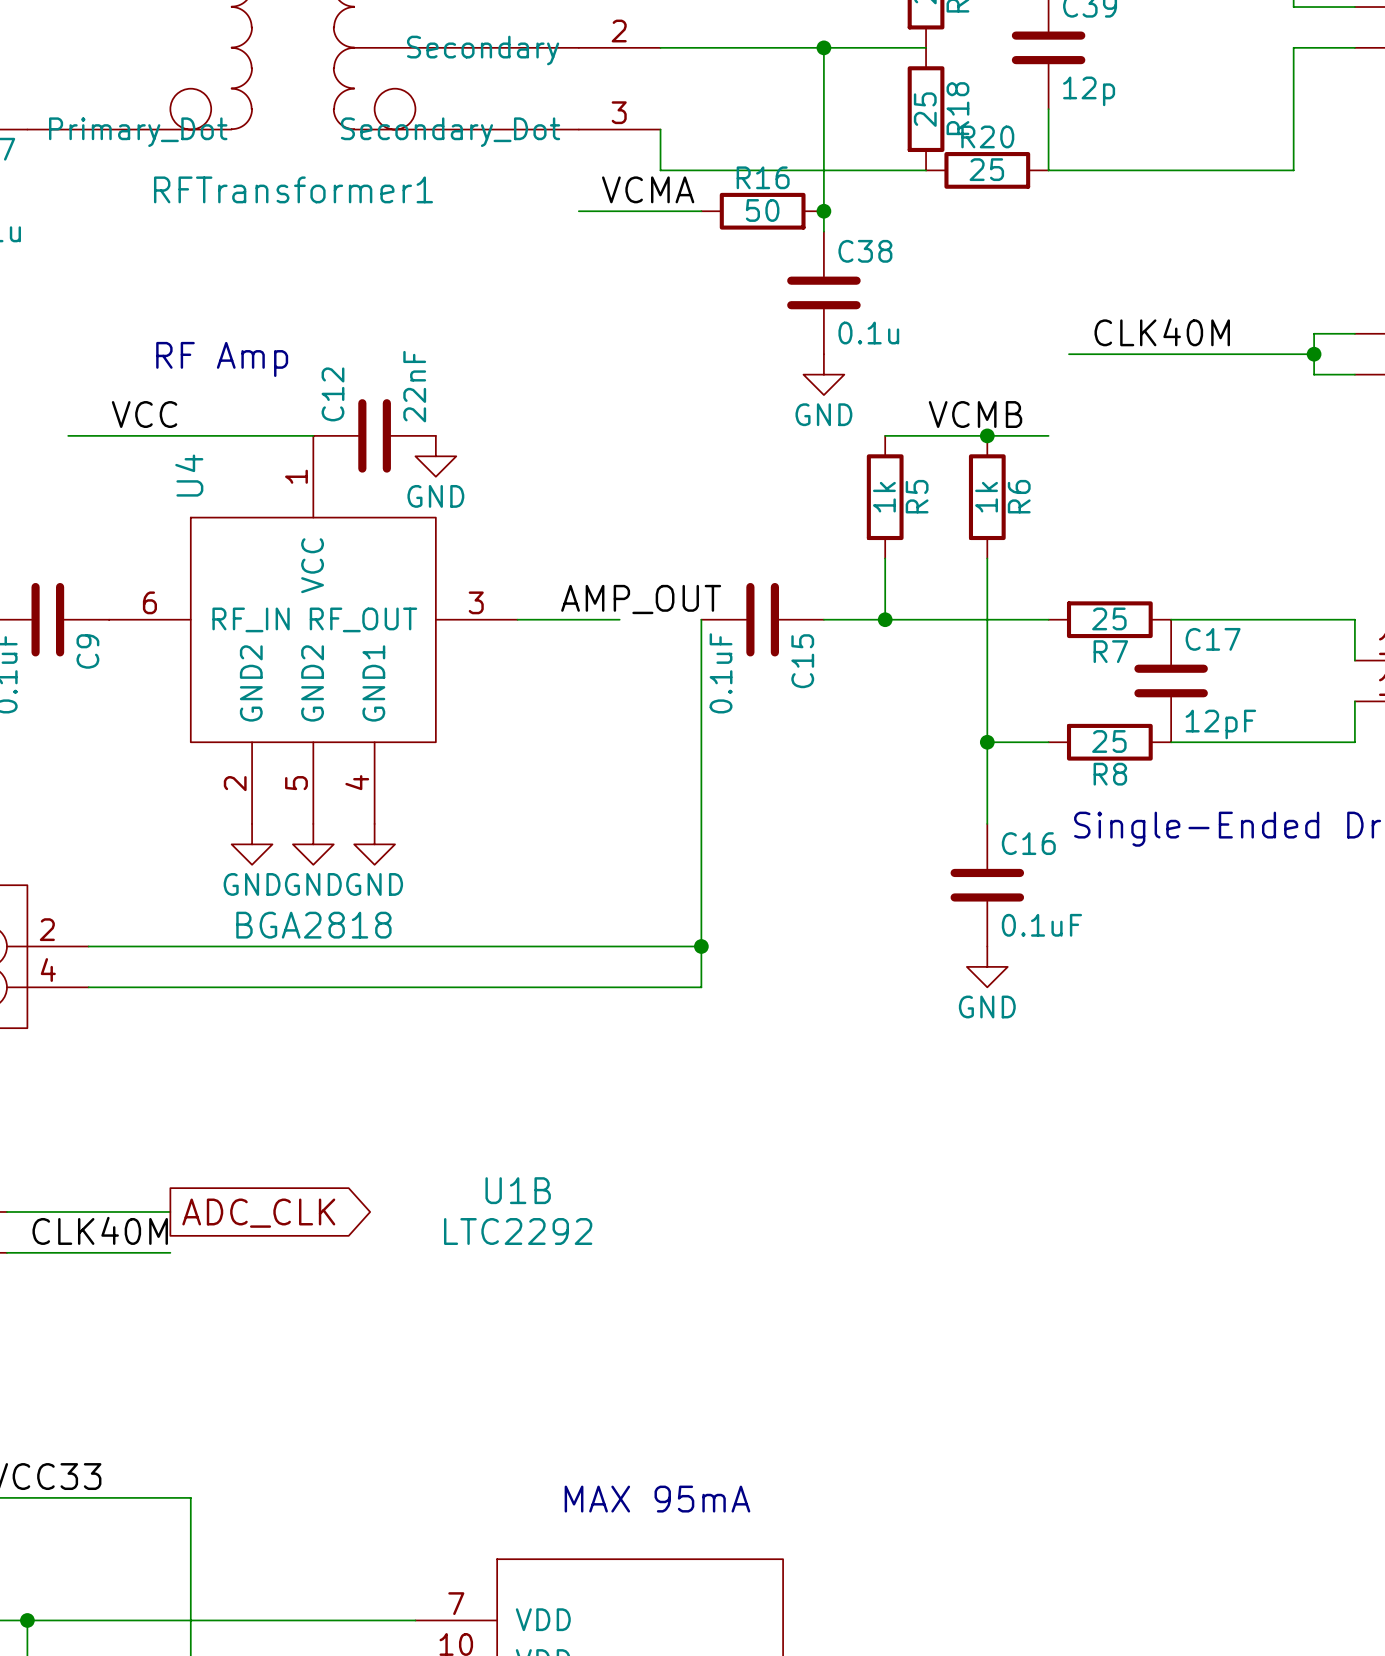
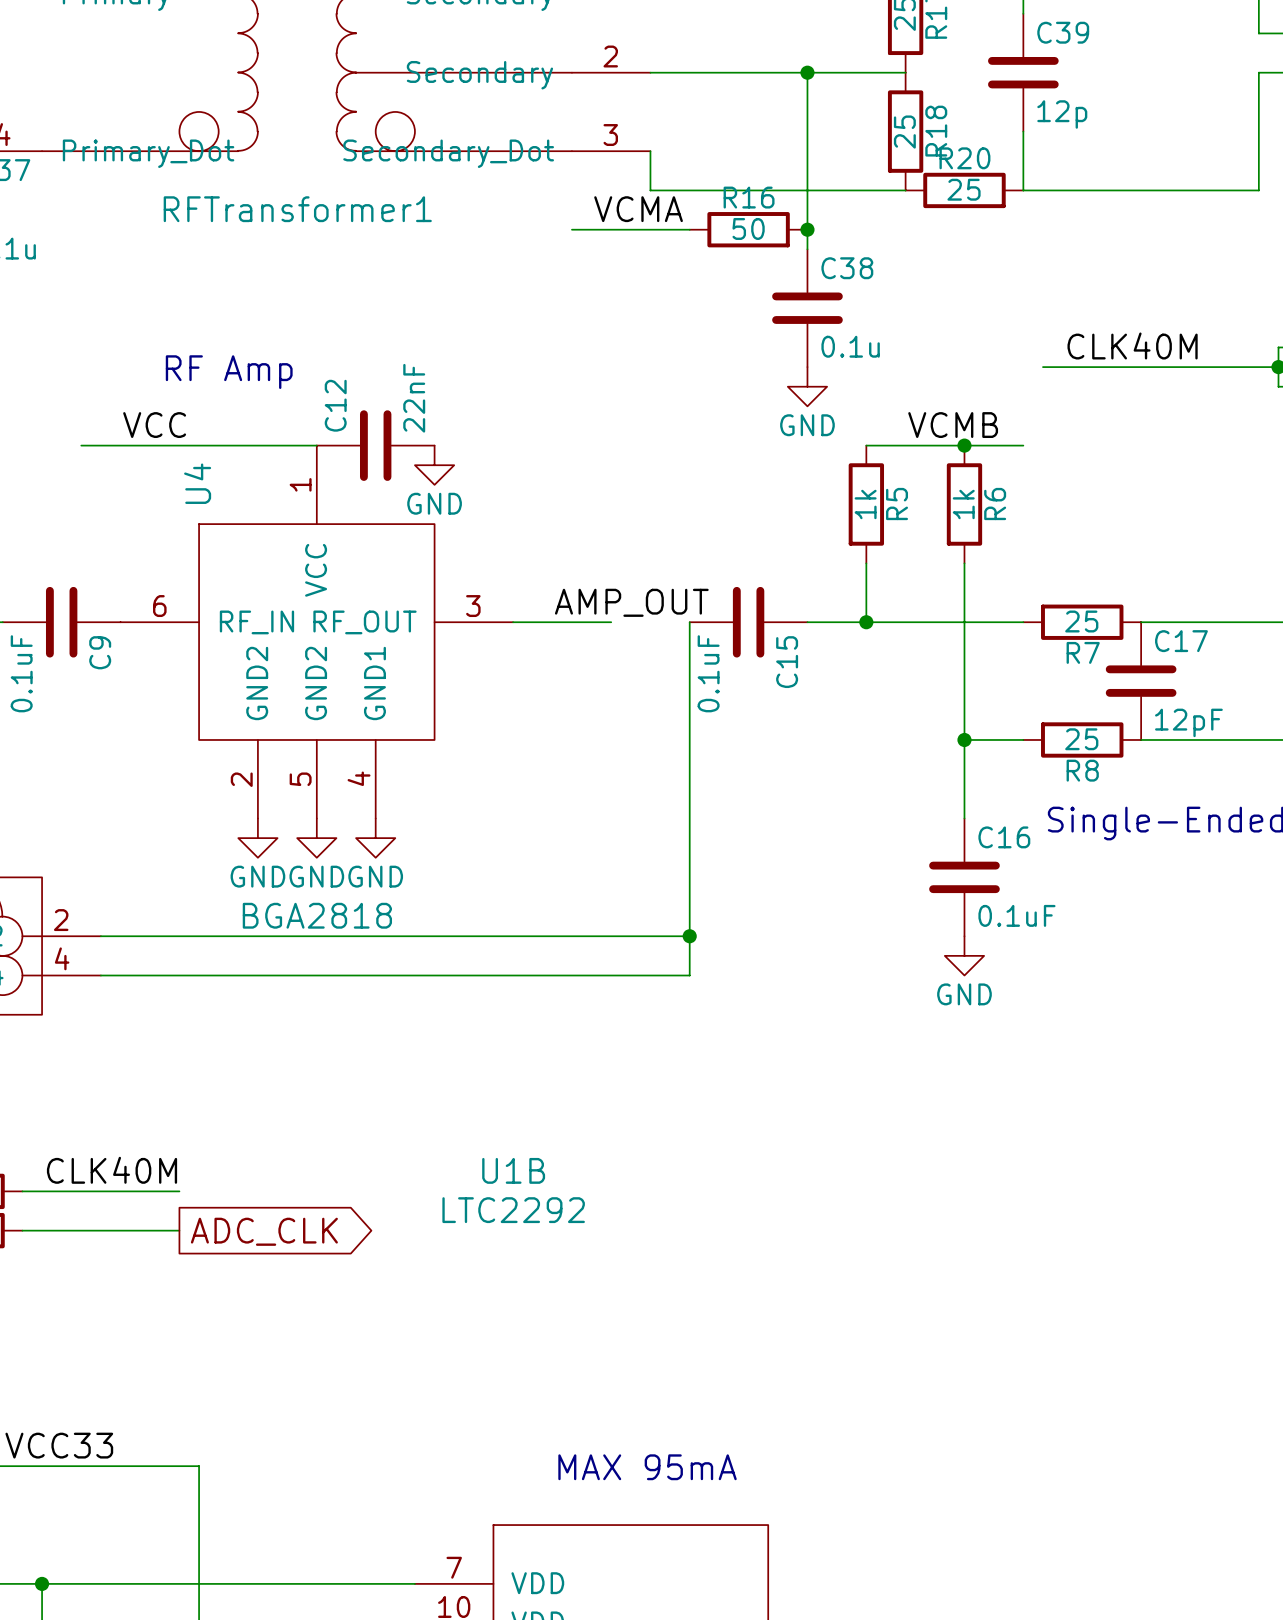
global label position: ADC_CLK (258, 1213) -> ADC_CLK (264, 1231)
label position: CLK40M (100, 1230) -> CLK40M (112, 1170)

